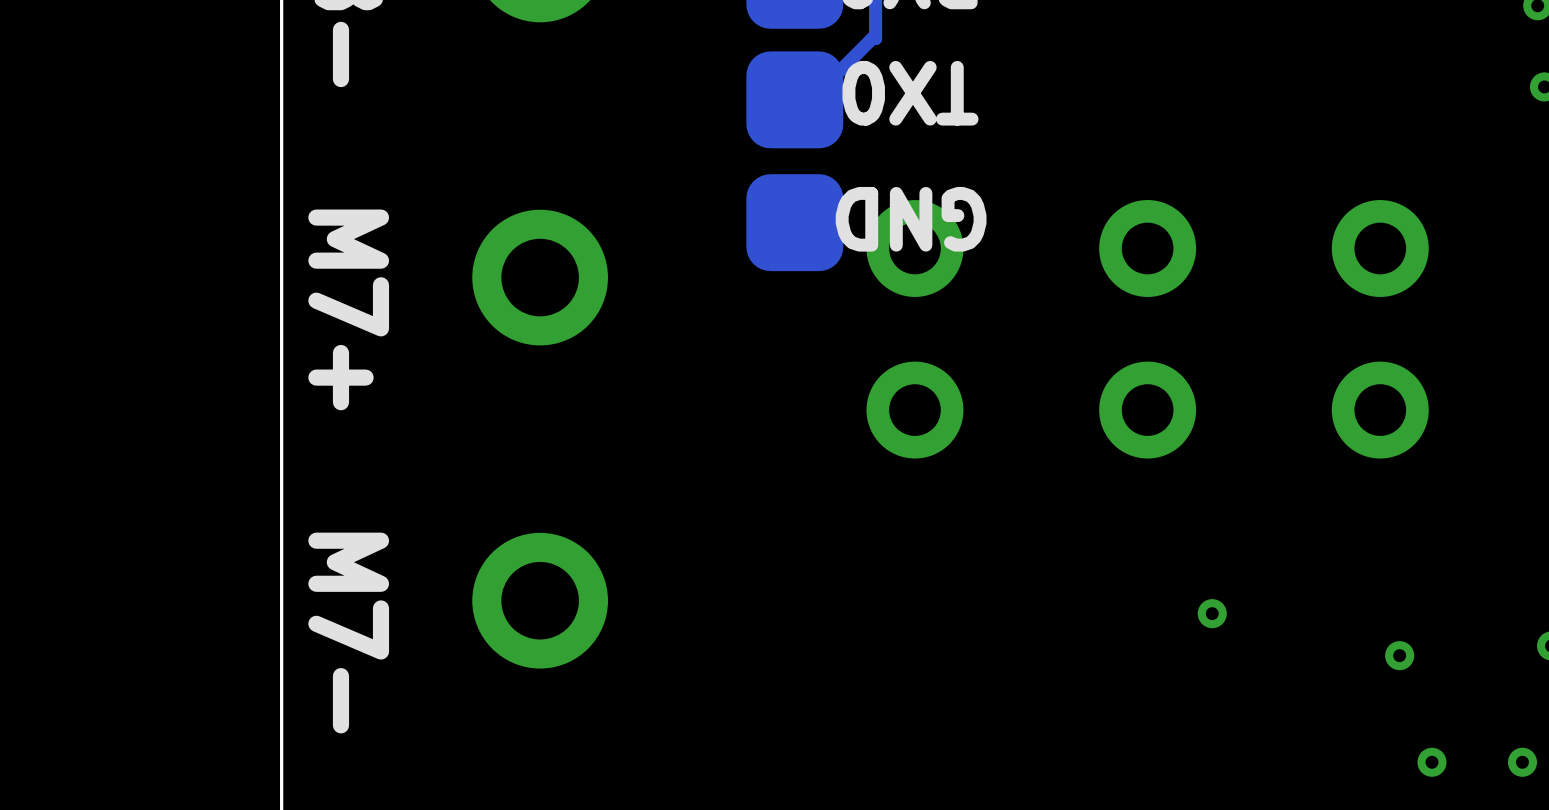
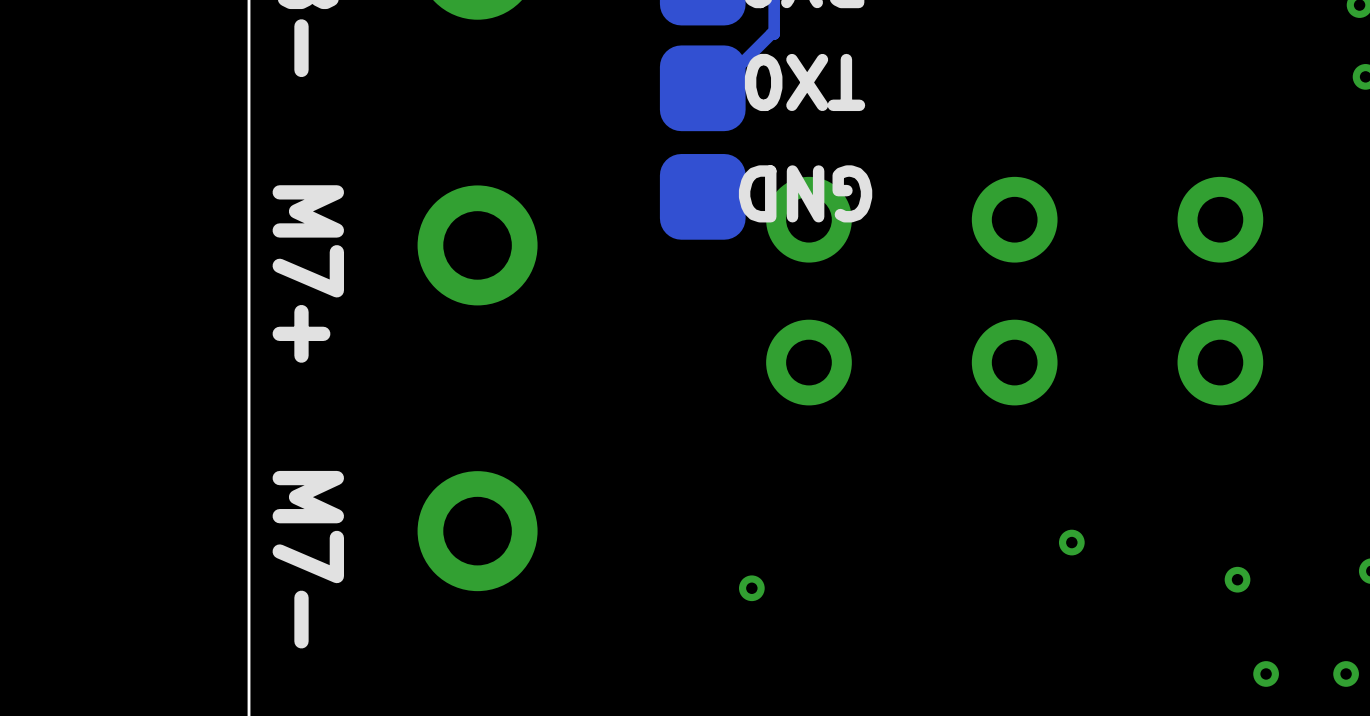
via: none -> (751, 588)

